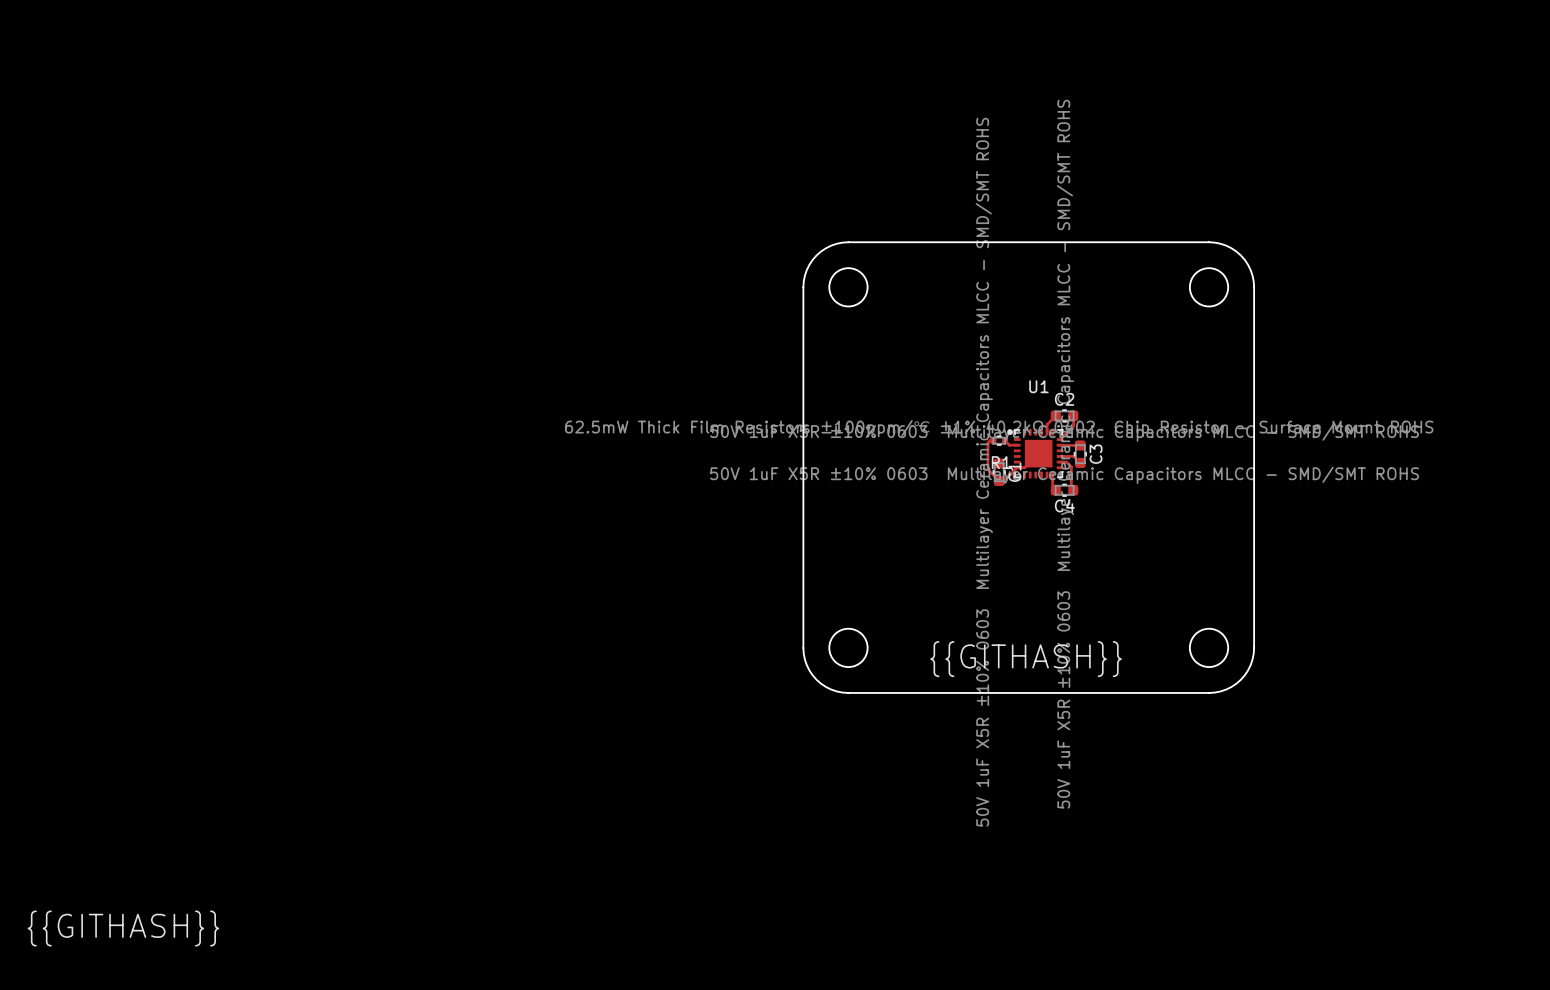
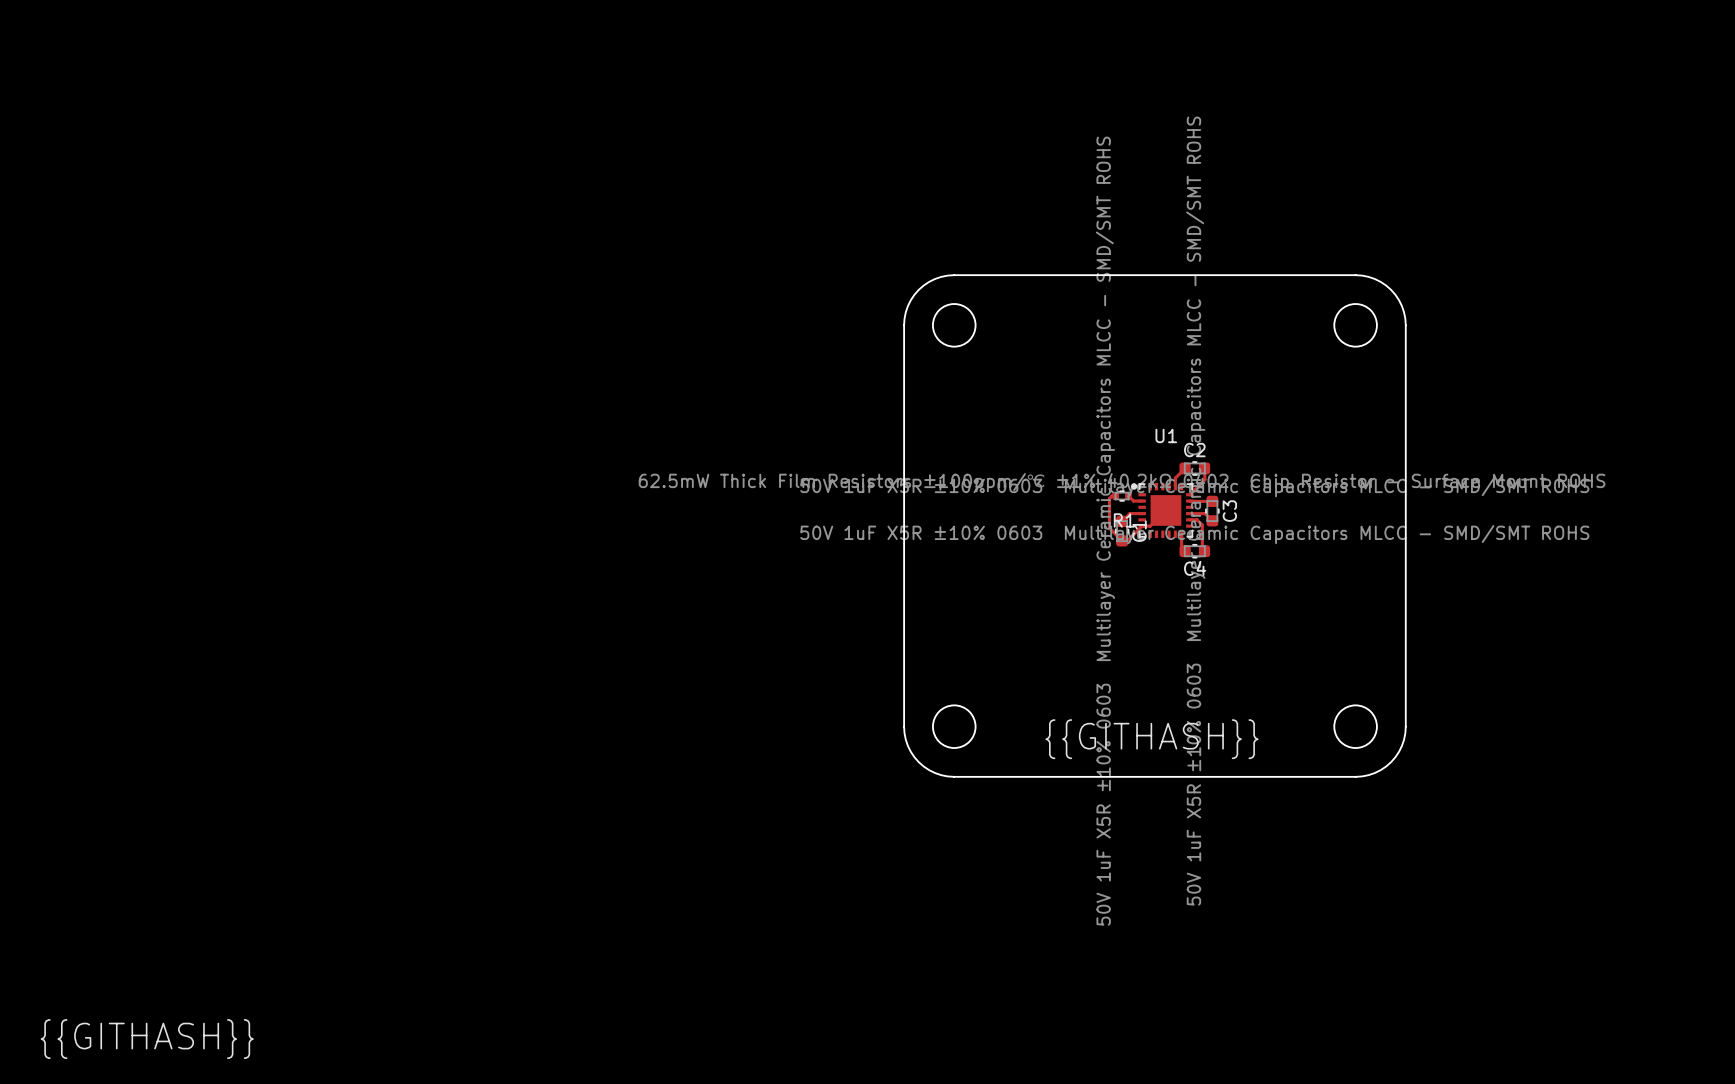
top track: none -> (1142, 513) (1129, 513) (1122, 521)

